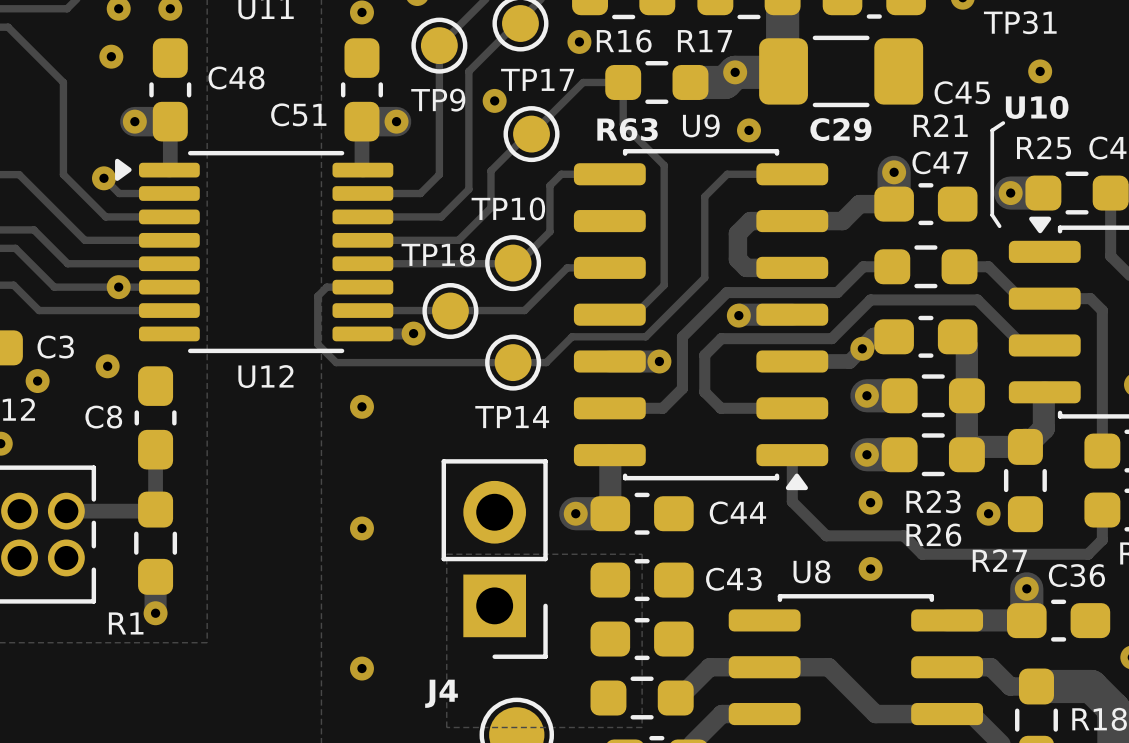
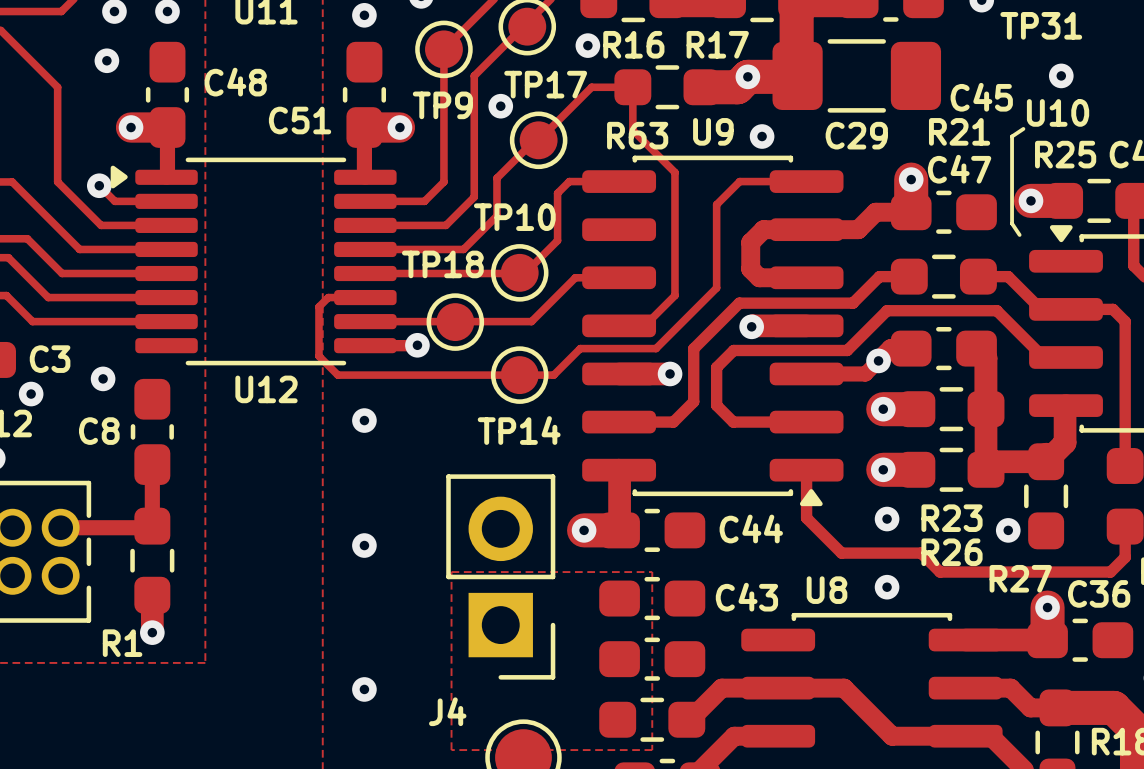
via: (118, 287) -> none

